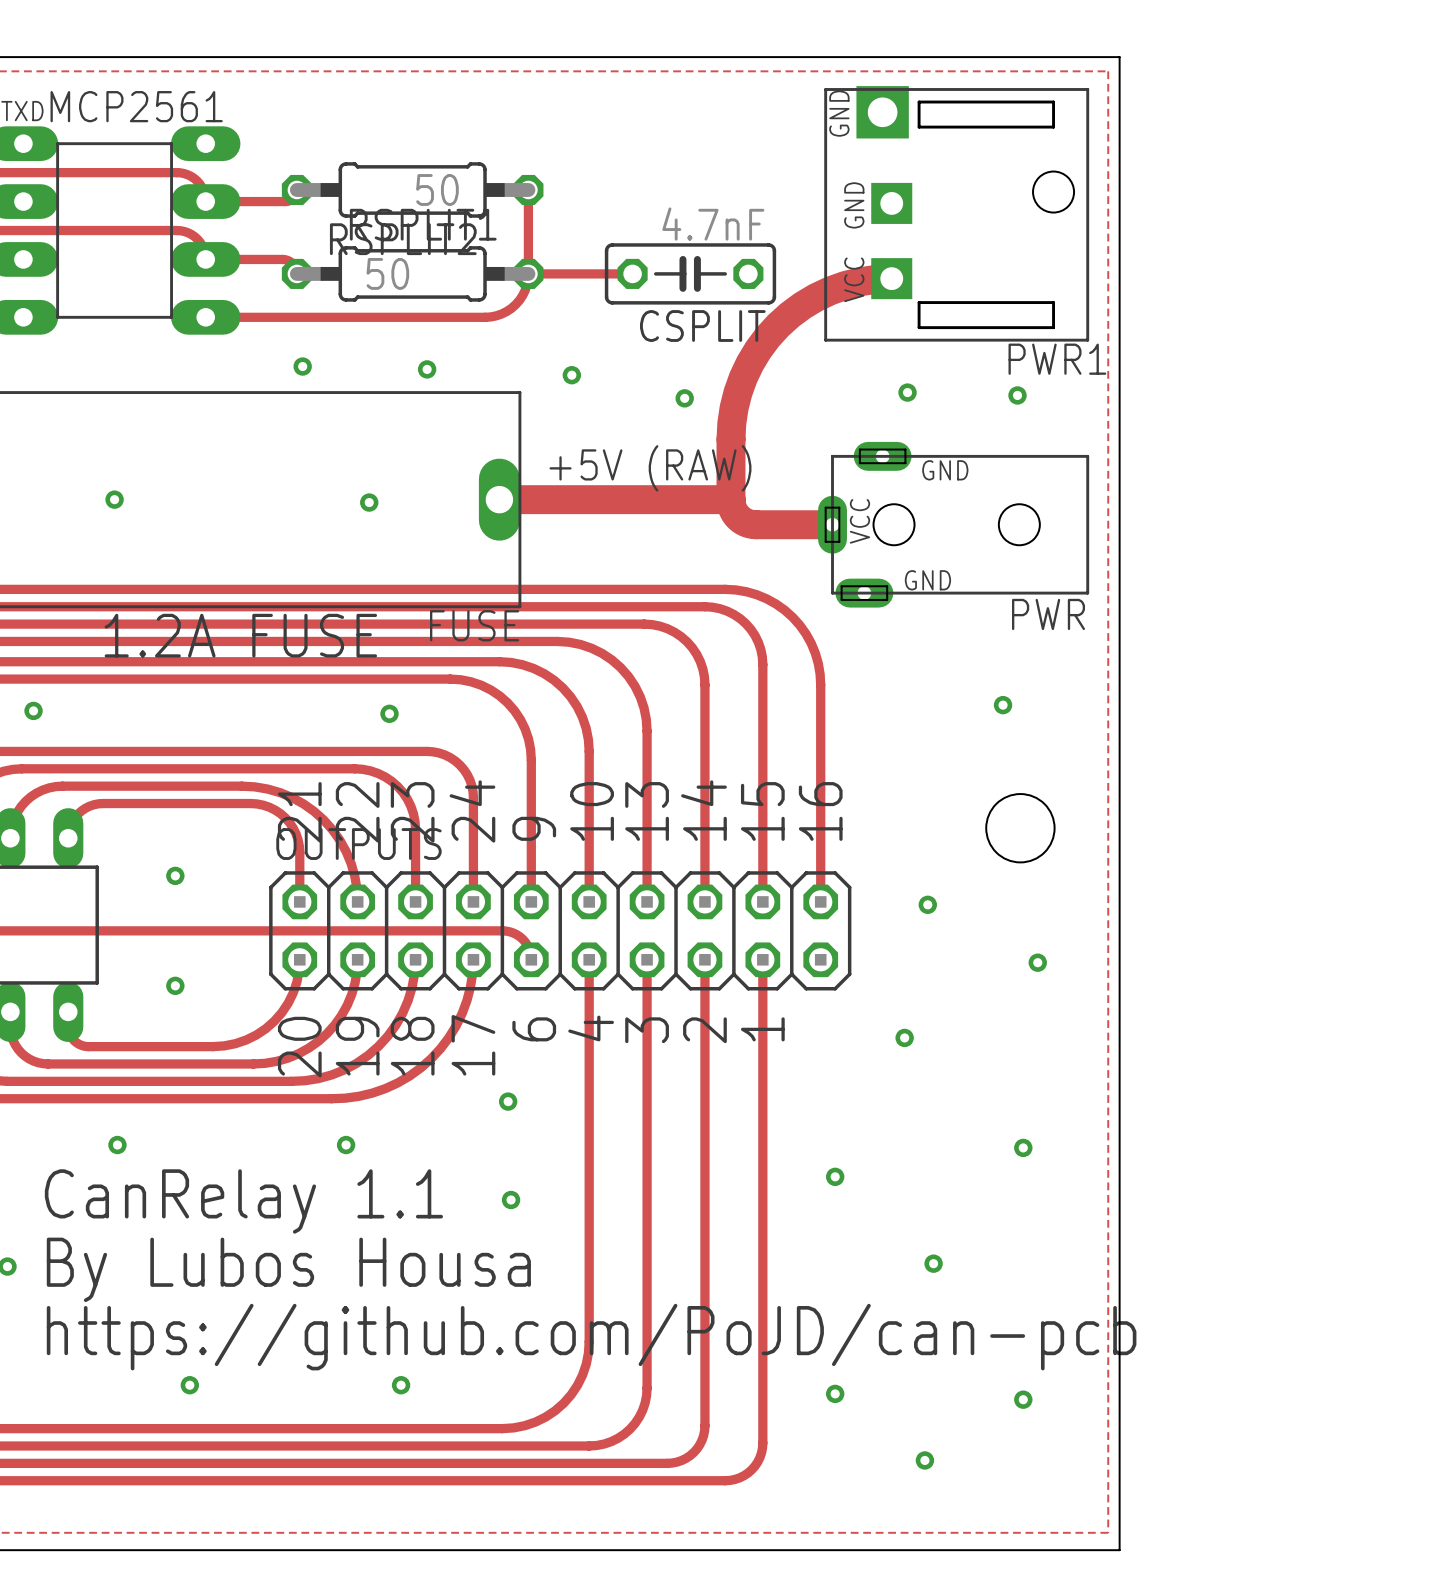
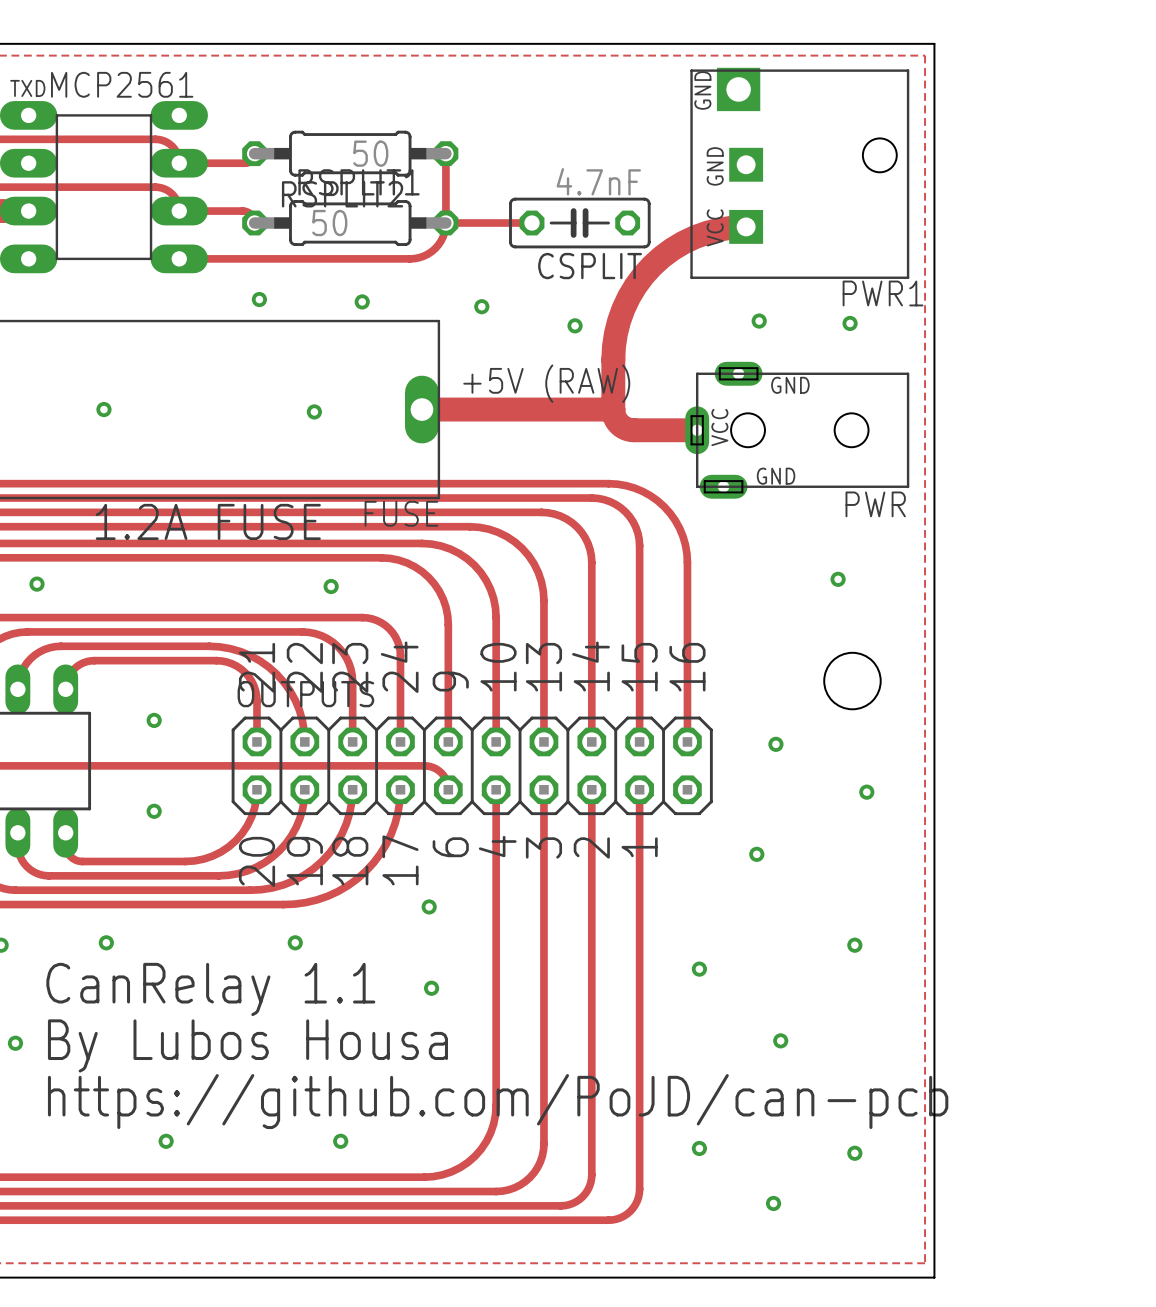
PWR1 footprint: [824, 86, 1090, 342] -> [690, 67, 910, 279]

